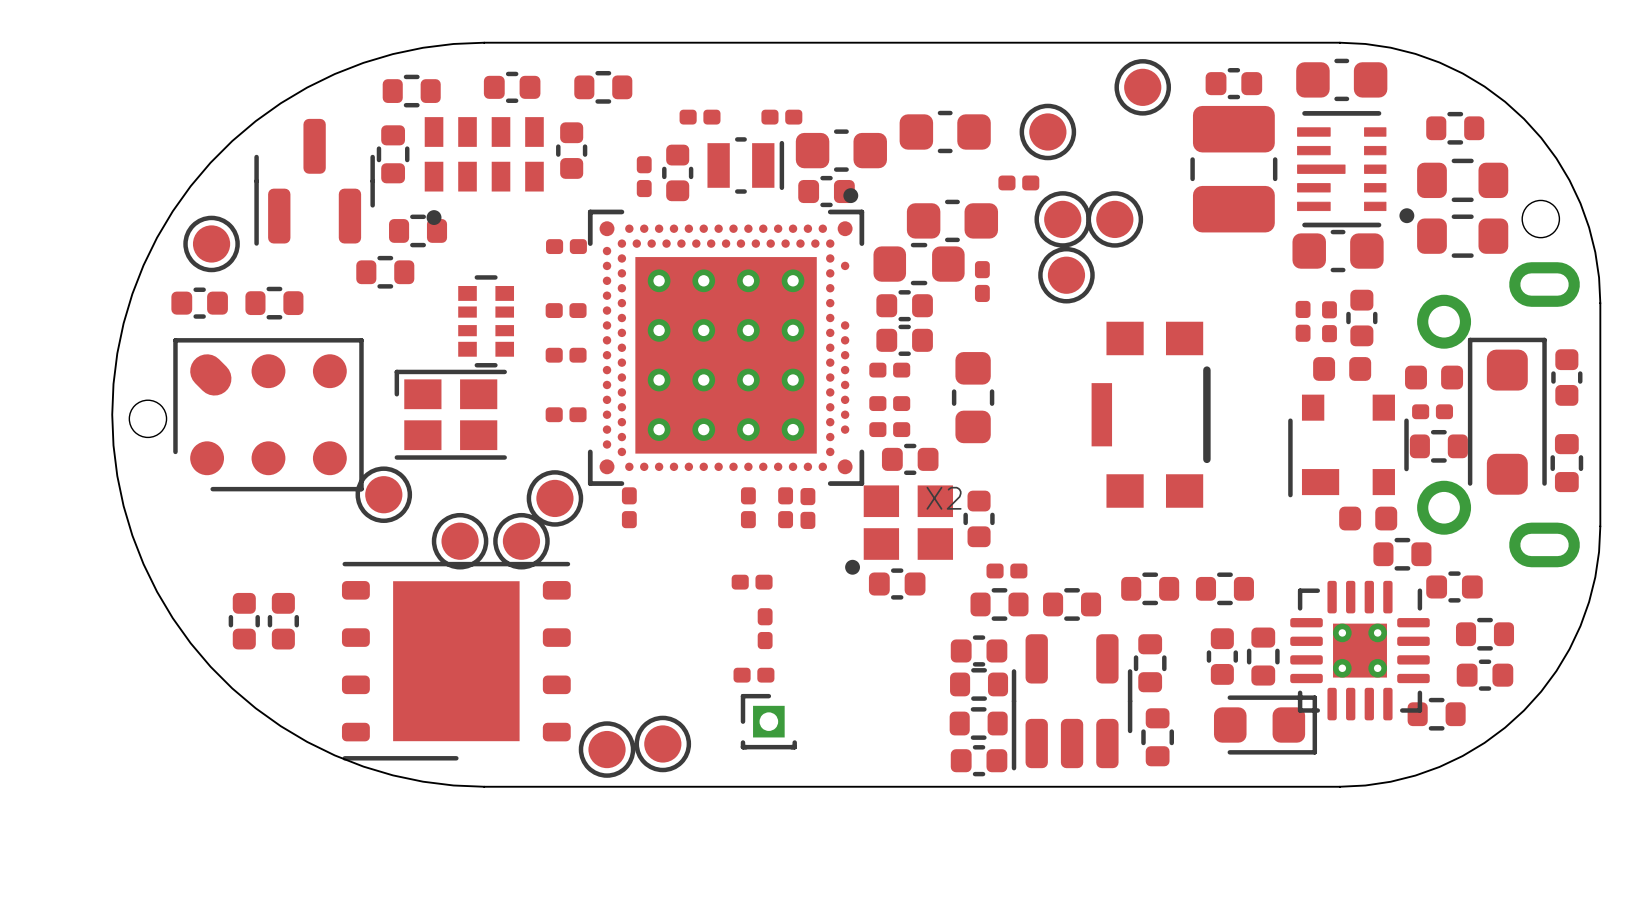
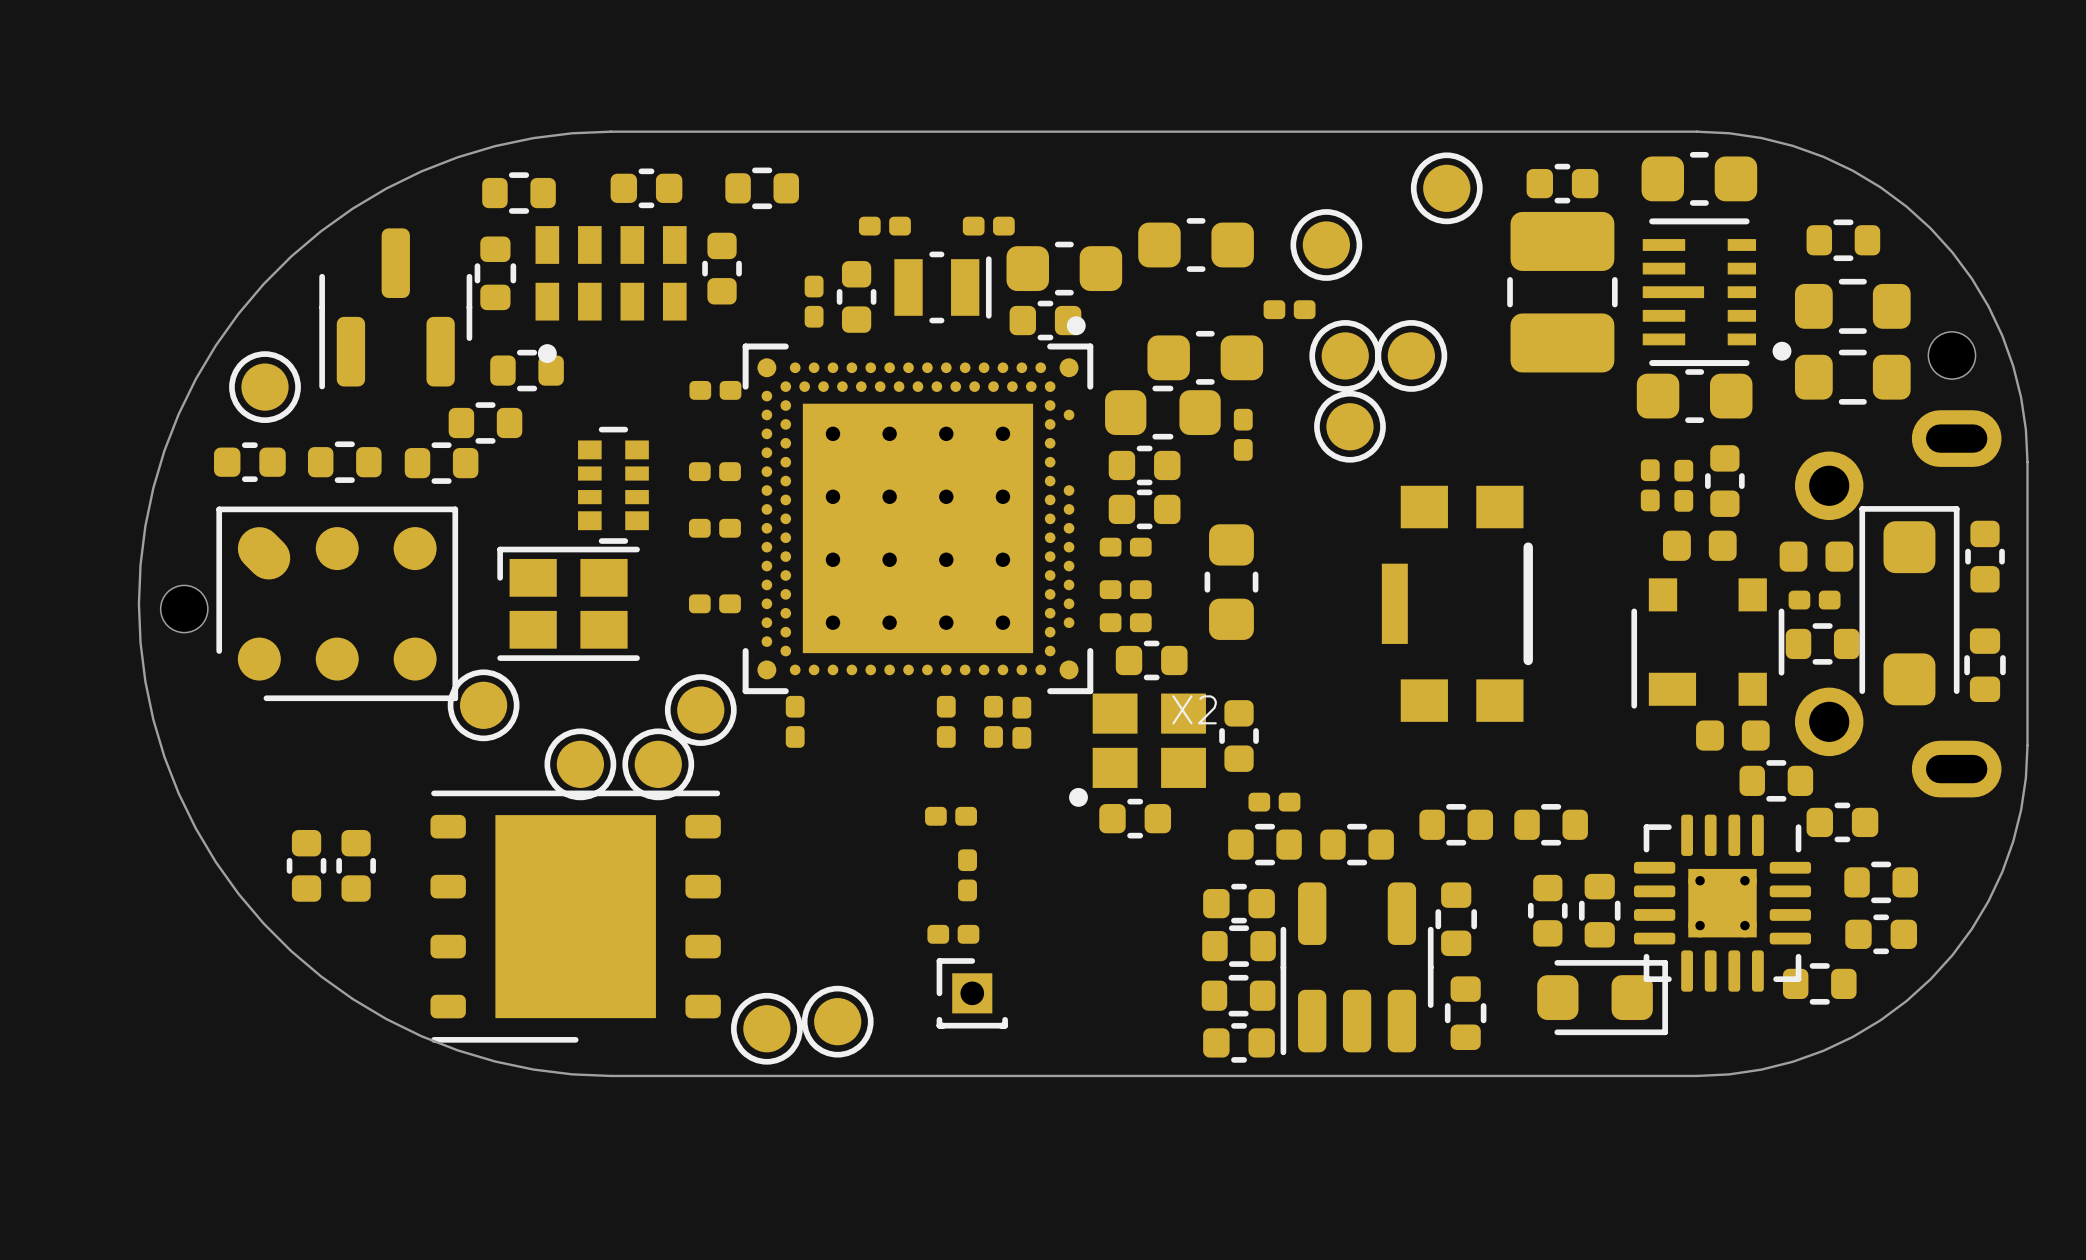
part: none -> (441, 463)

